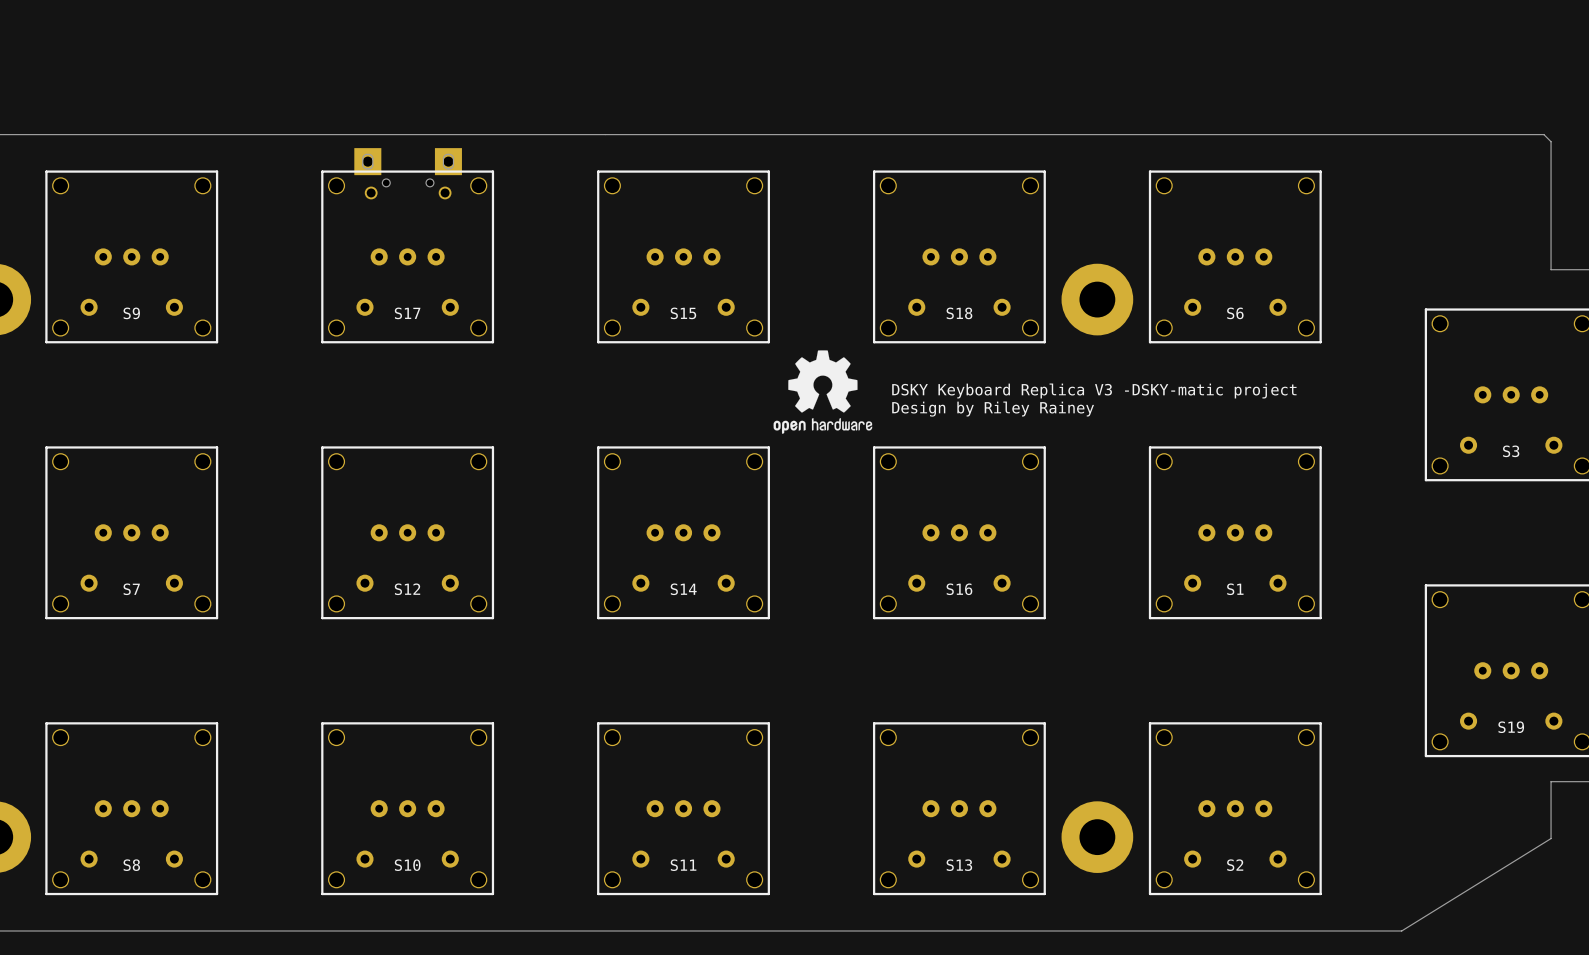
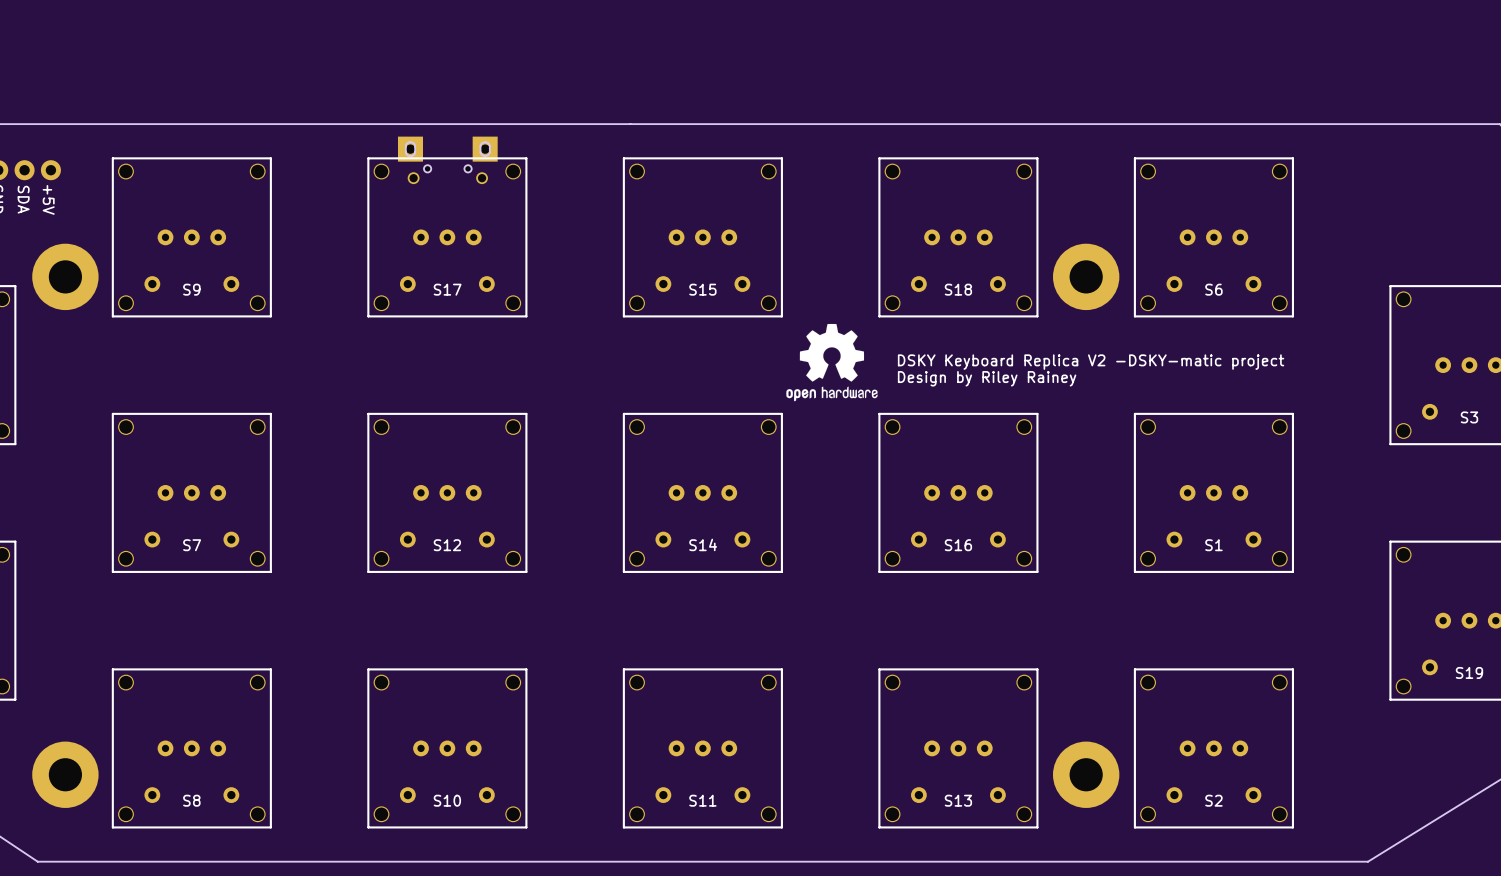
text: DSKY Keyboard Replica V3 -DSKY-matic project (1094, 391) -> DSKY Keyboard Replica V2 -DSKY-matic project (1091, 362)

